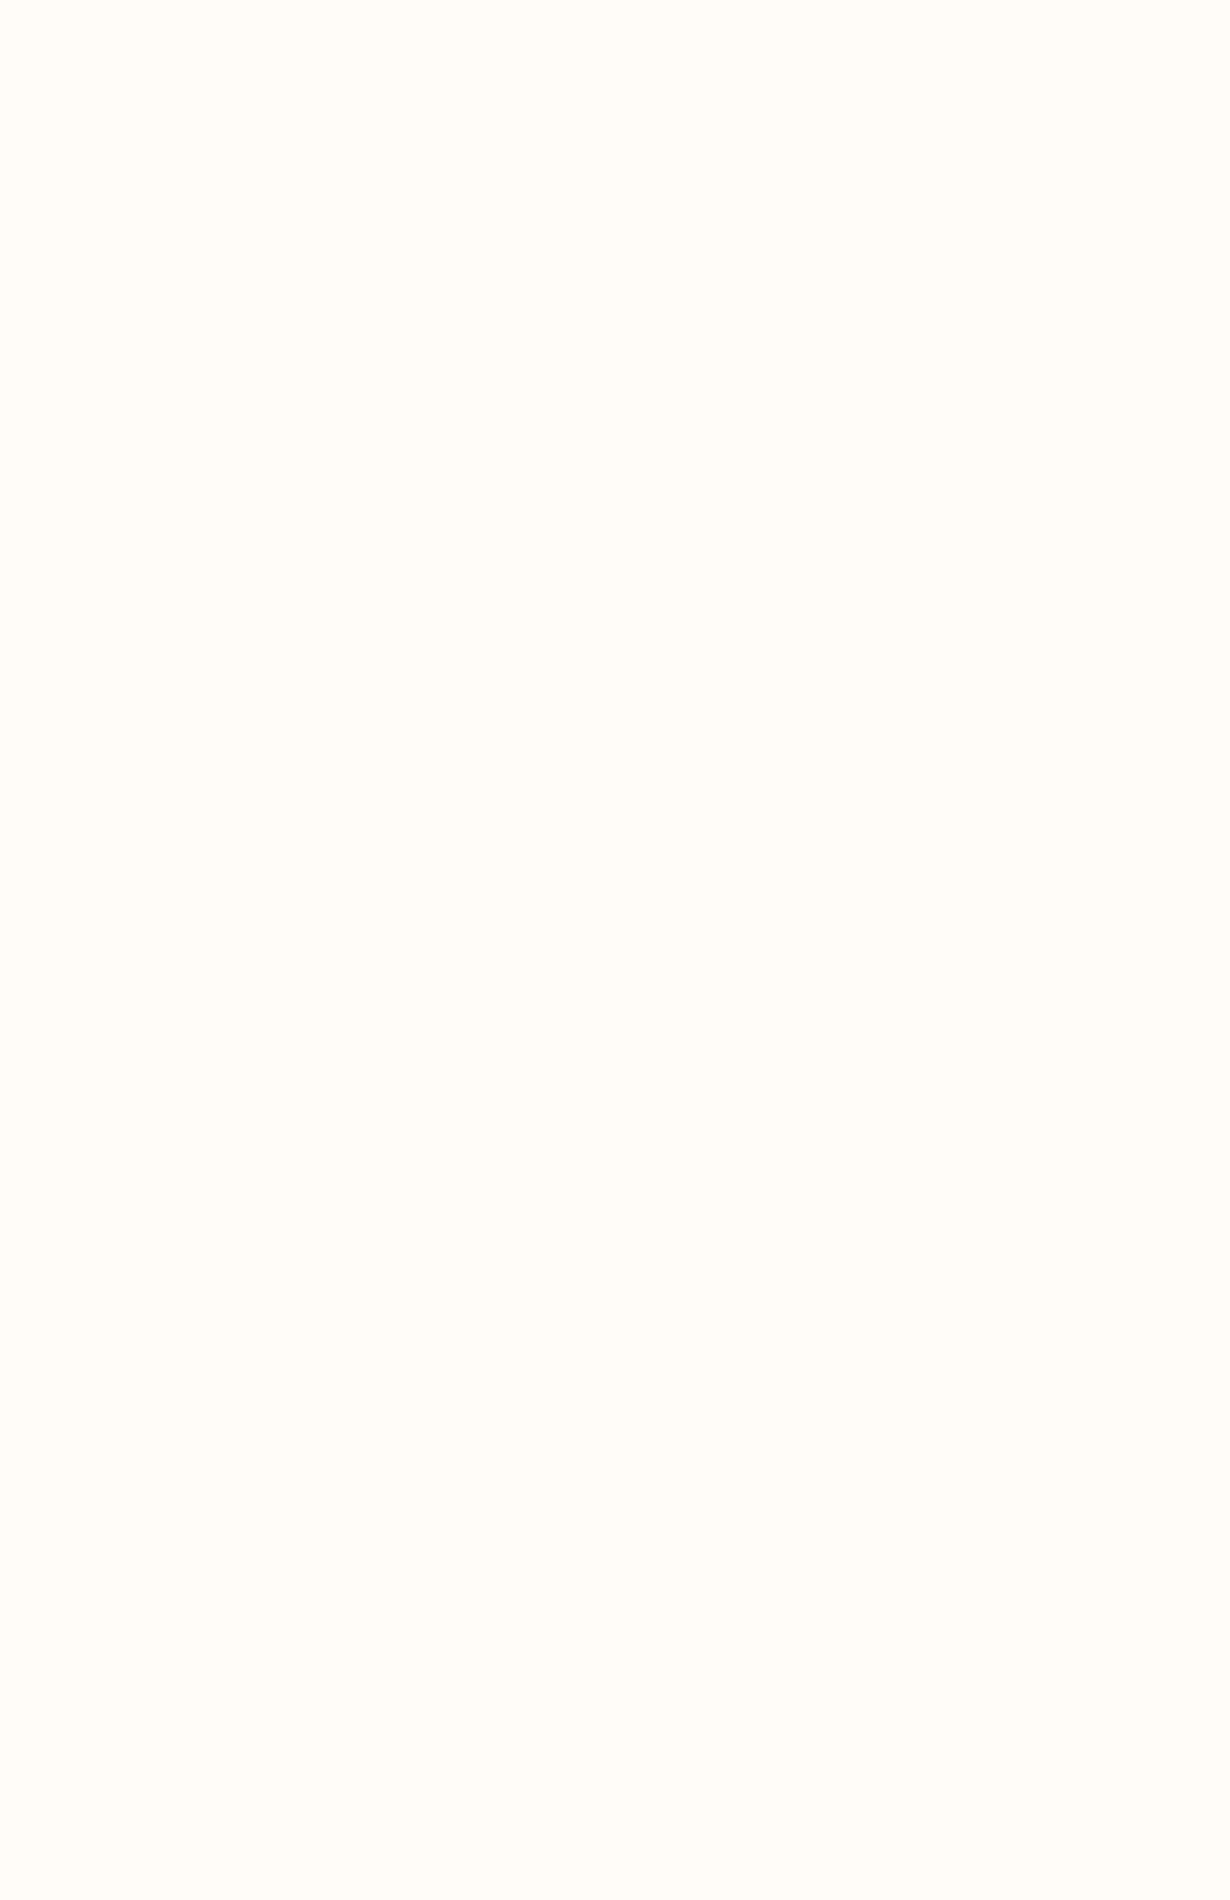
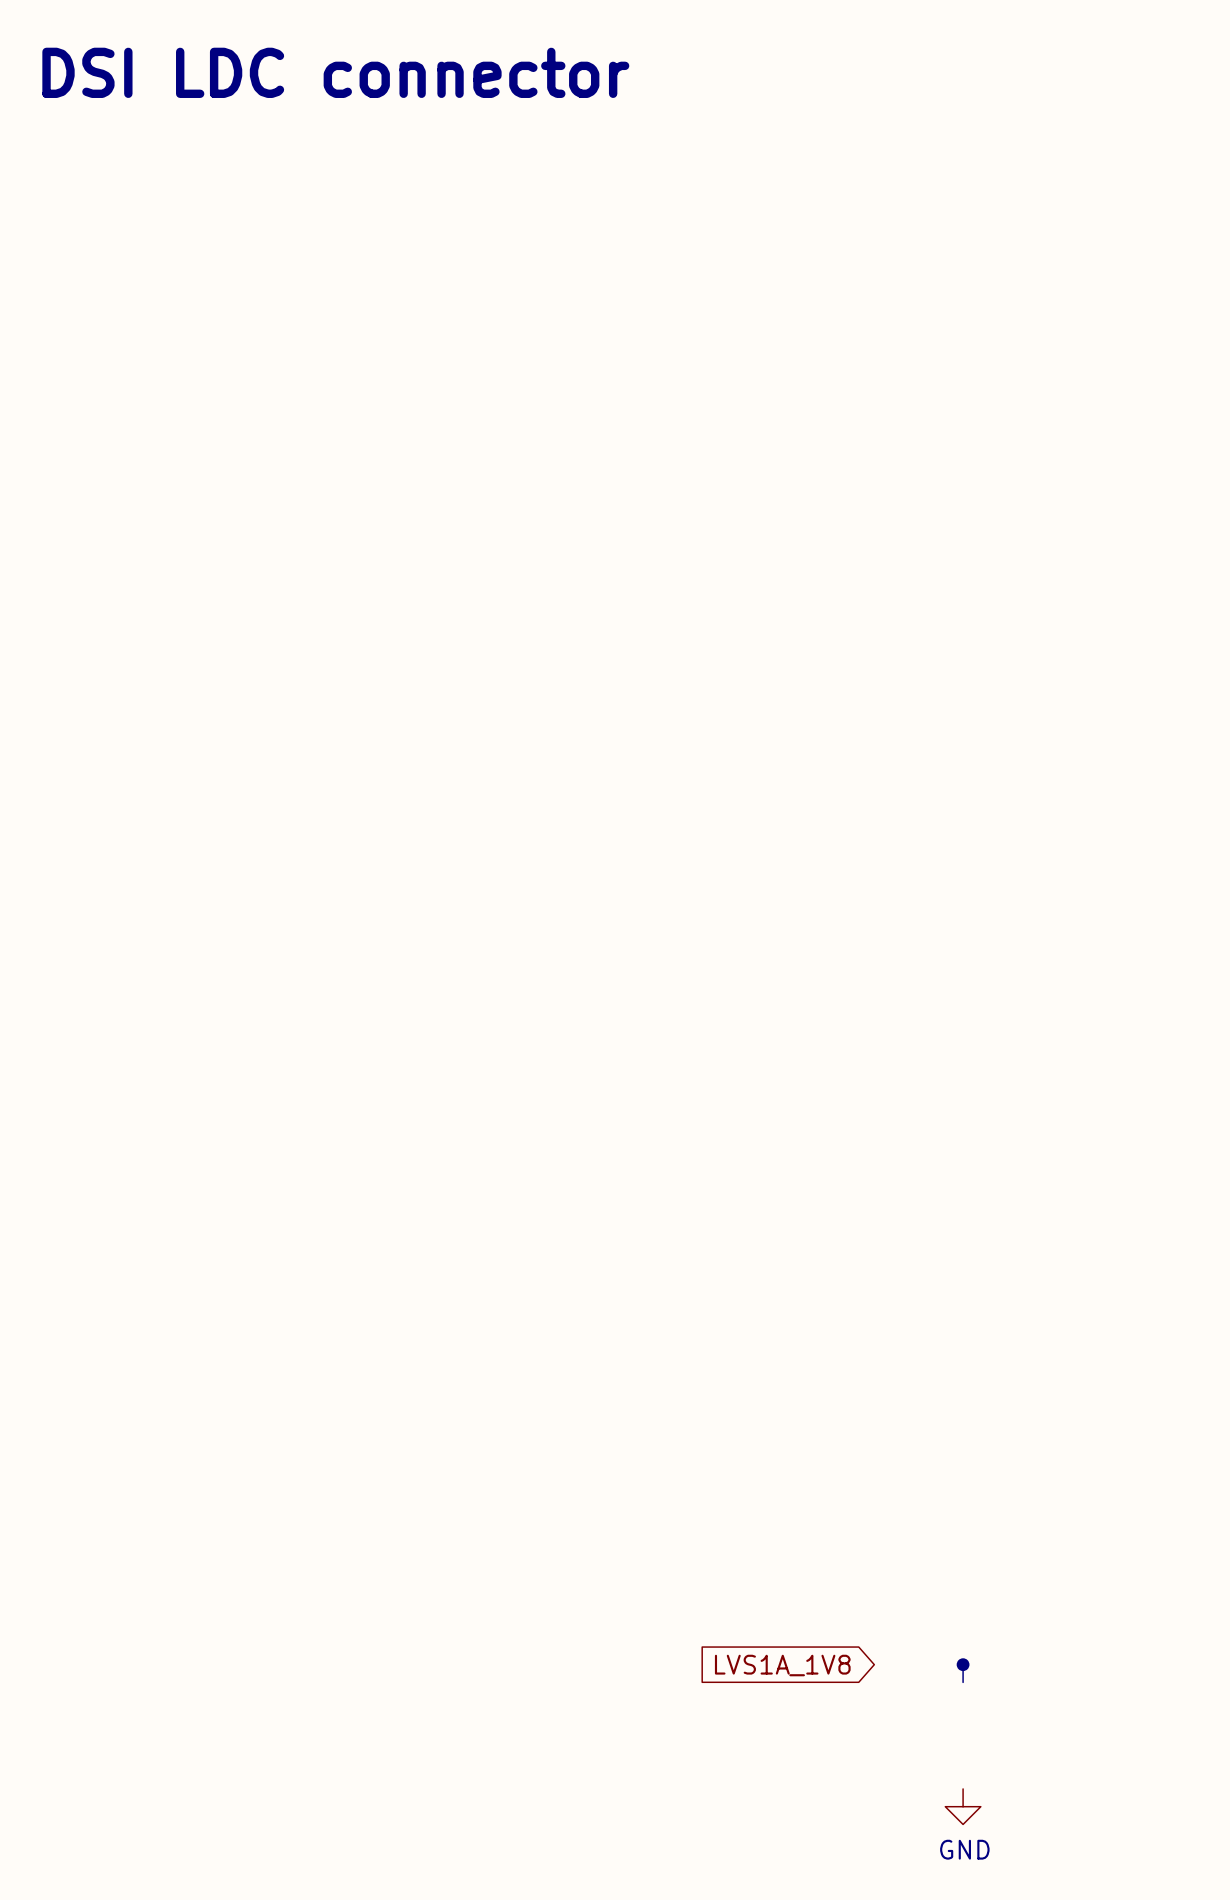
text: none -> DSI LDC connector (335, 72)
wire: none -> (963, 1664) (963, 1682)
junction: none -> (963, 1664)
global label: none -> LVS1A_1V8 (782, 1665)
power symbol: none -> GND (963, 1806)

